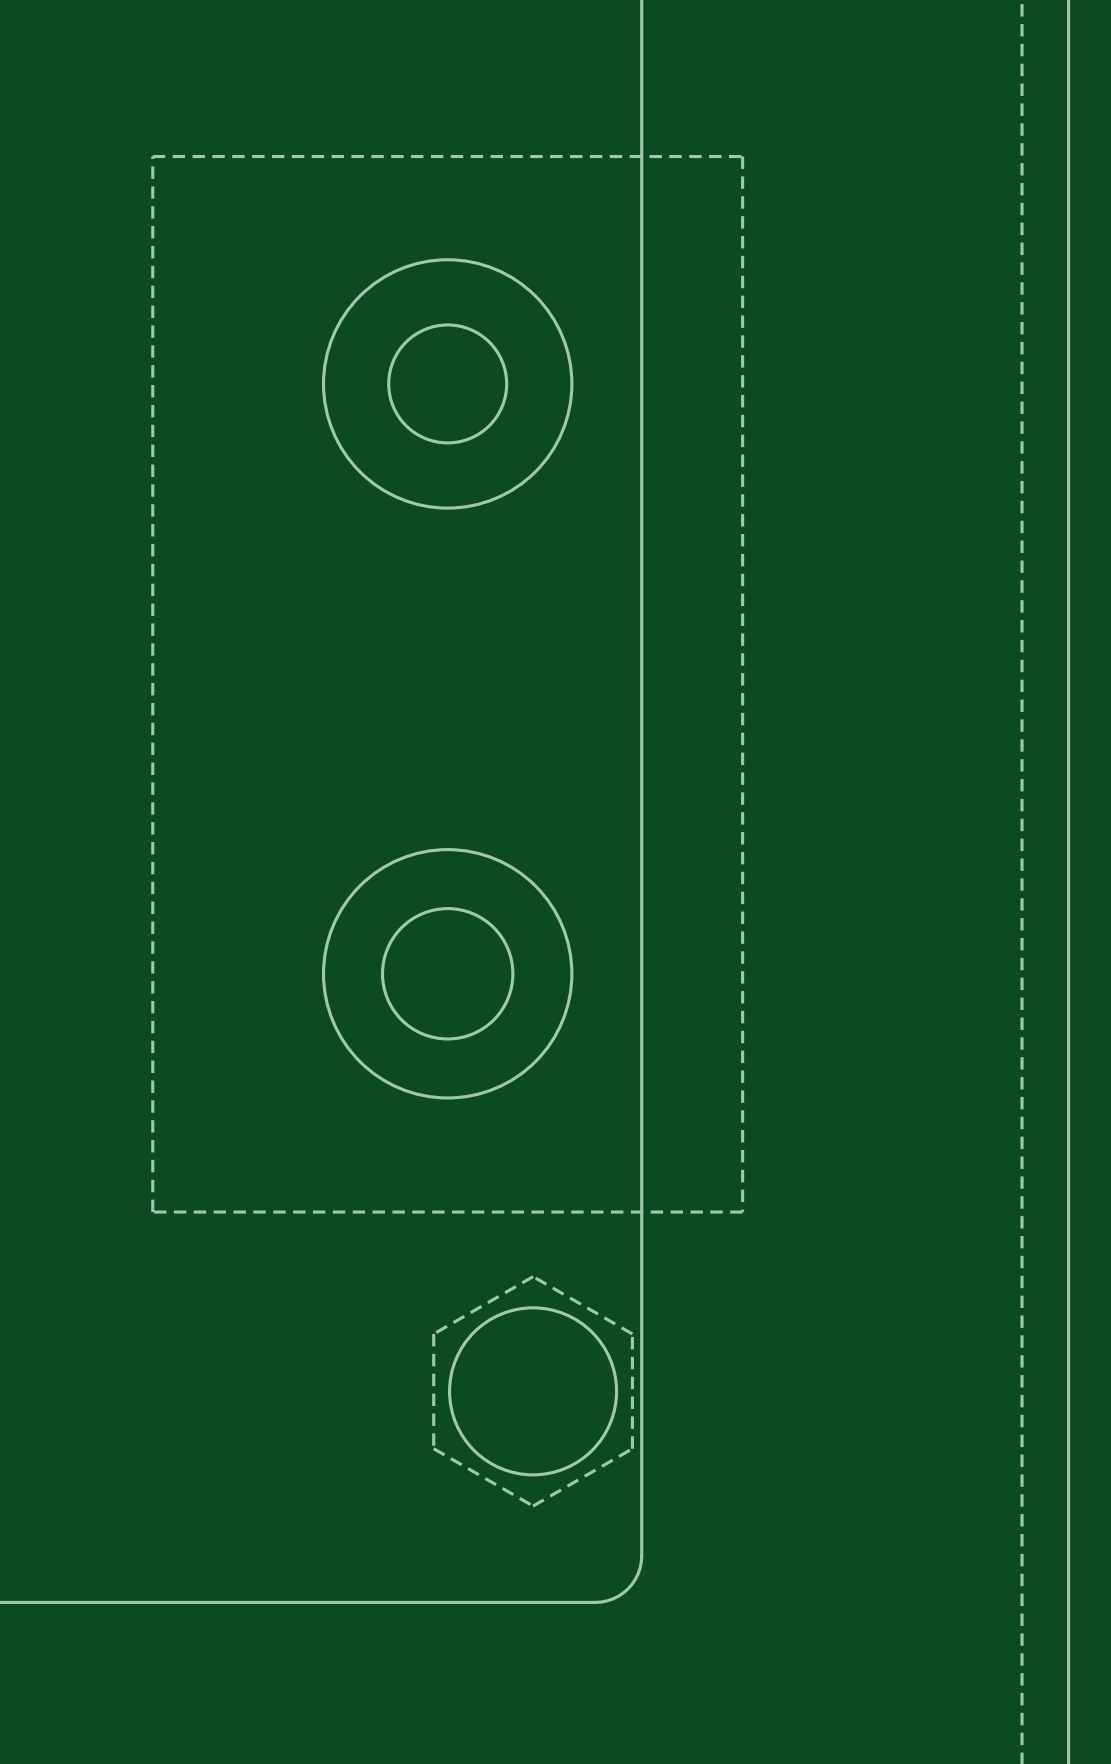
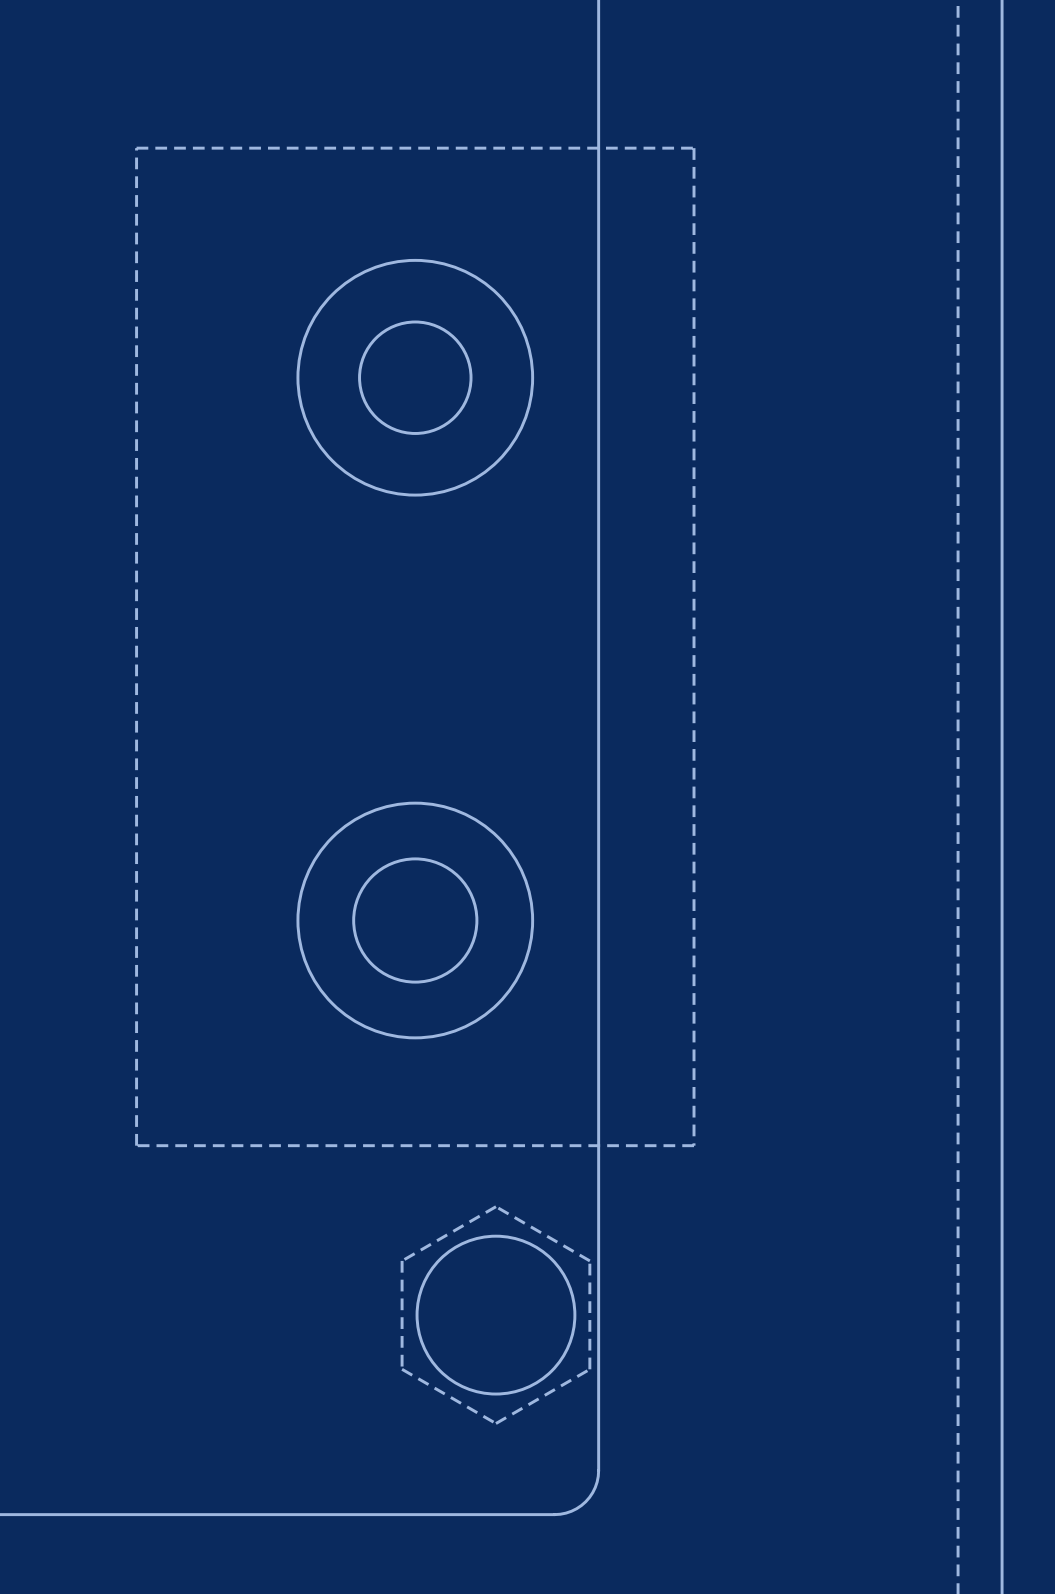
drawing position: (447, 383) -> (415, 377)
drawing position: (447, 383) -> (415, 377)

